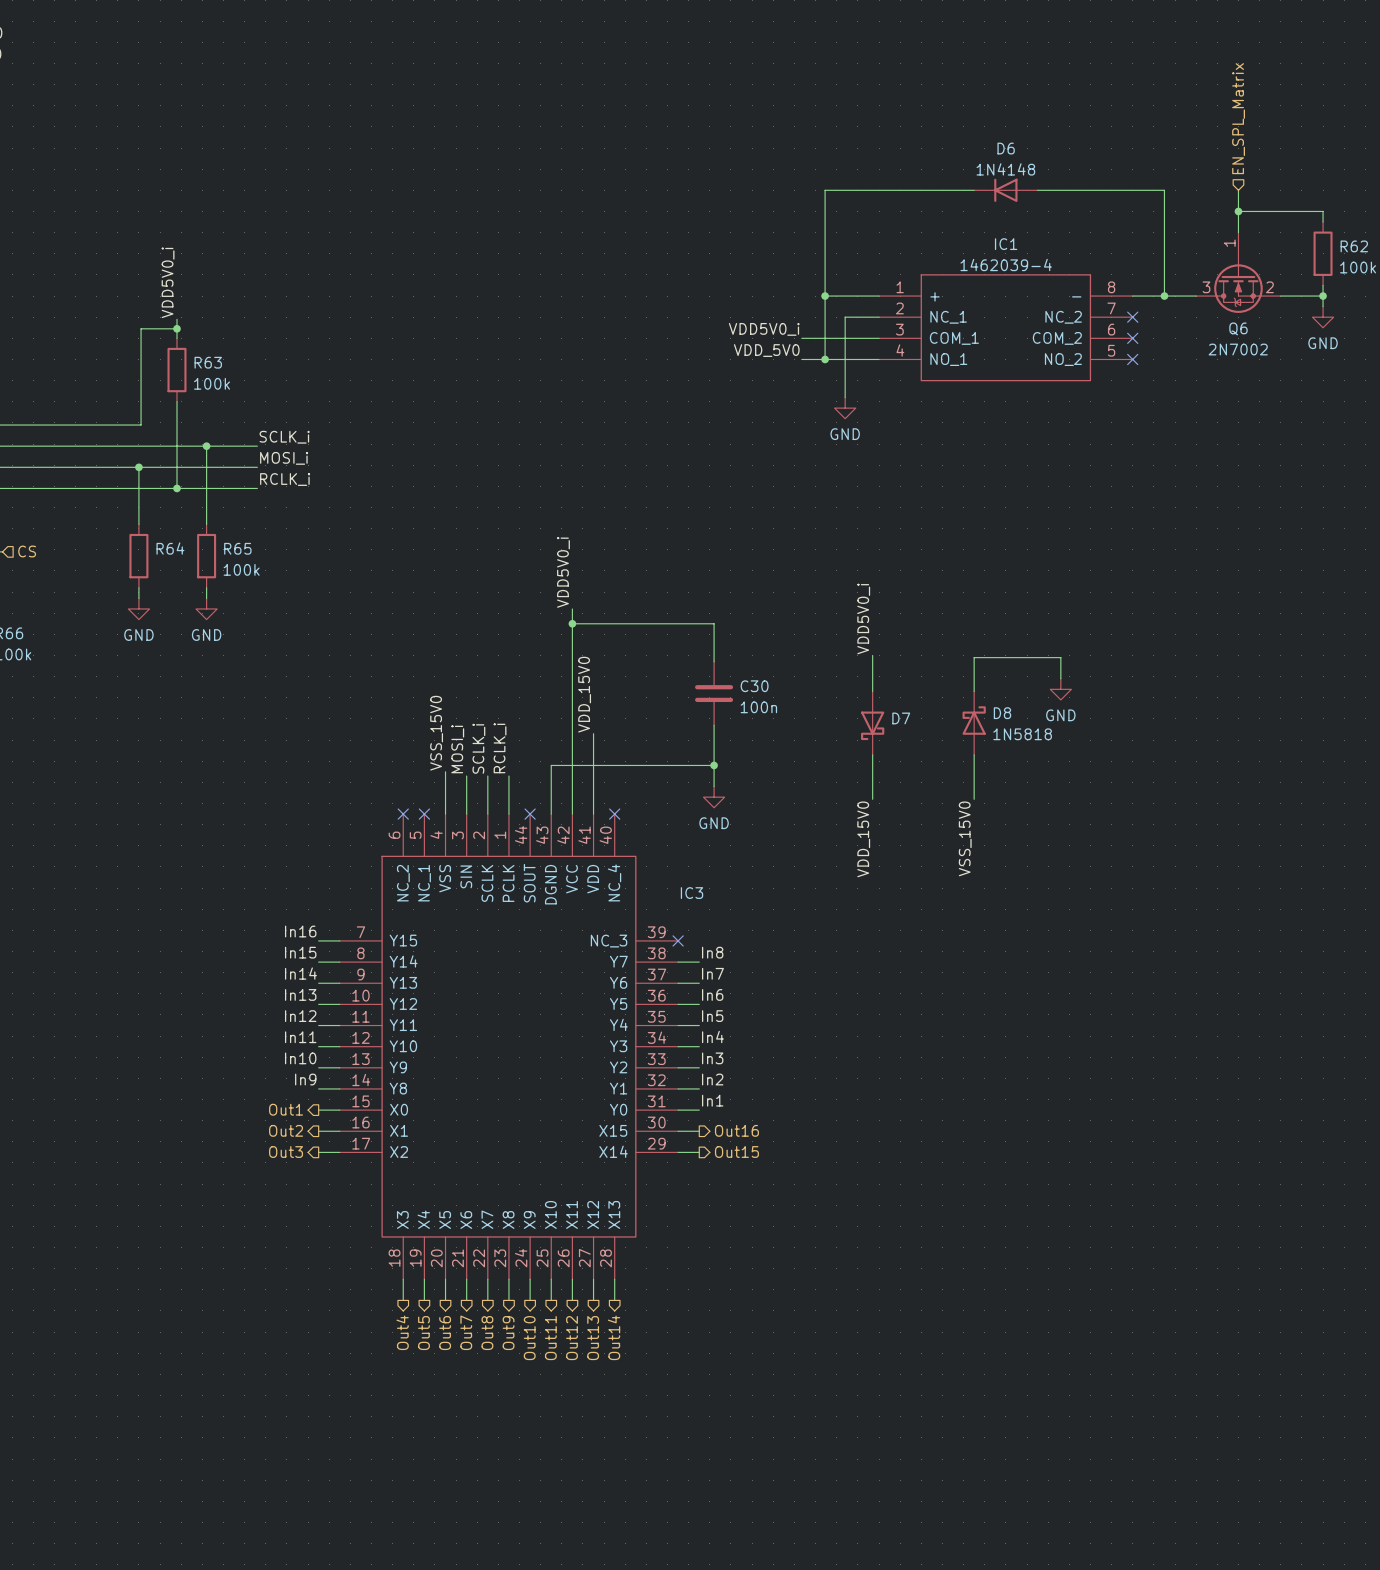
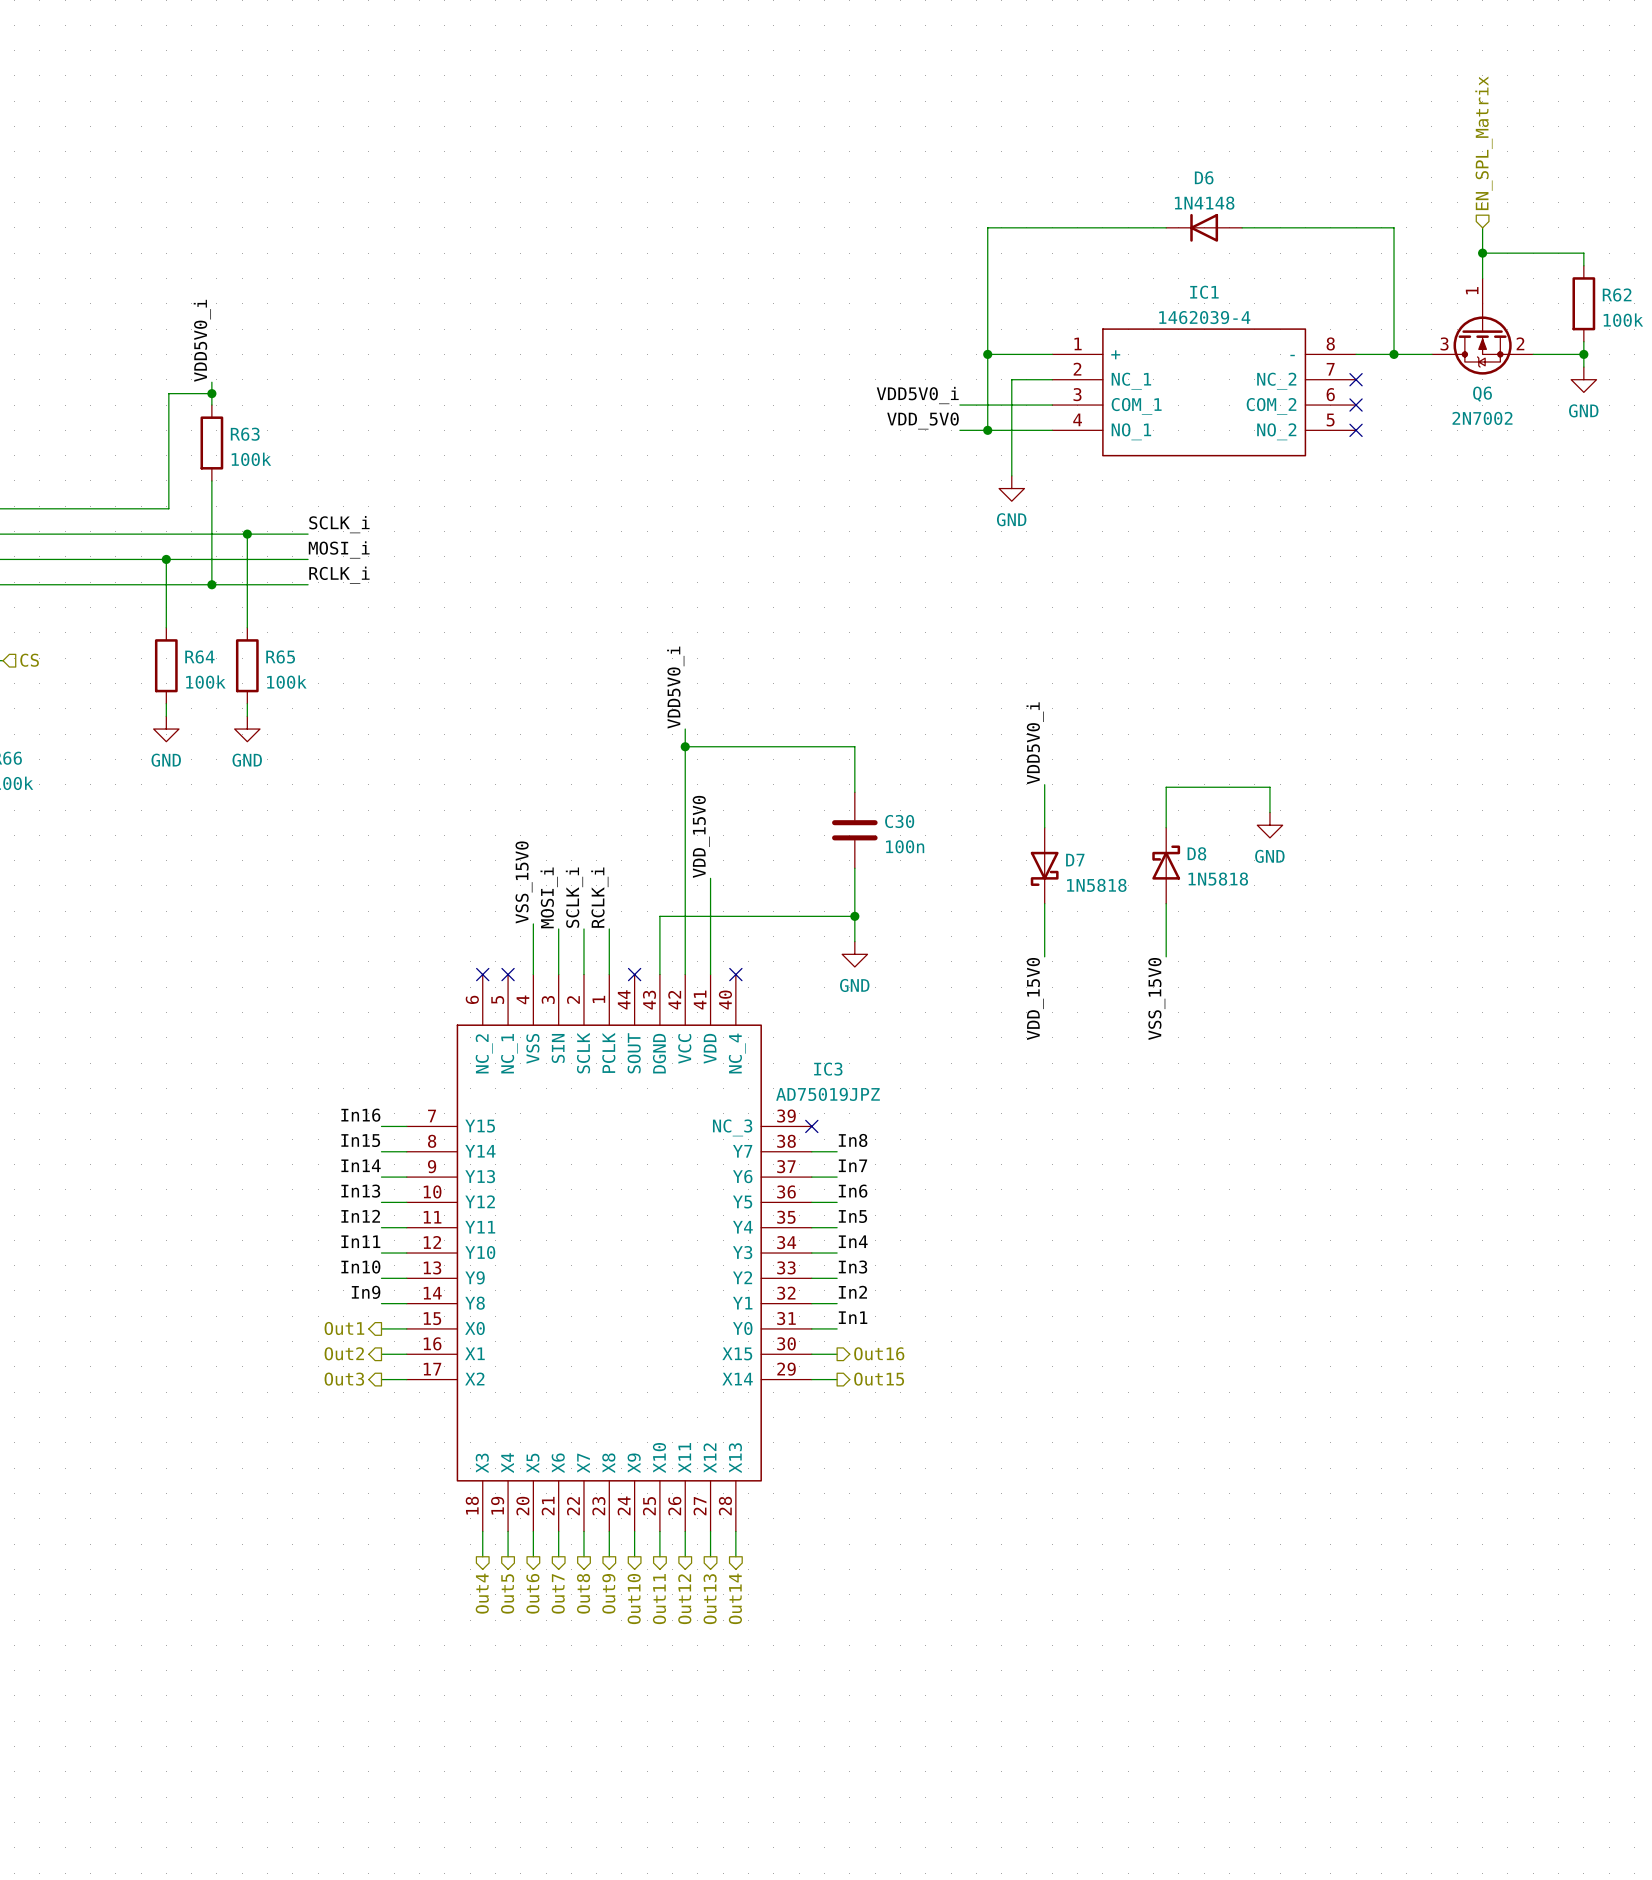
R64 value: none -> 100k (205, 682)
D7 value: none -> 1N5818 (1096, 885)
IC3 value: none -> AD75019JPZ (828, 1094)

